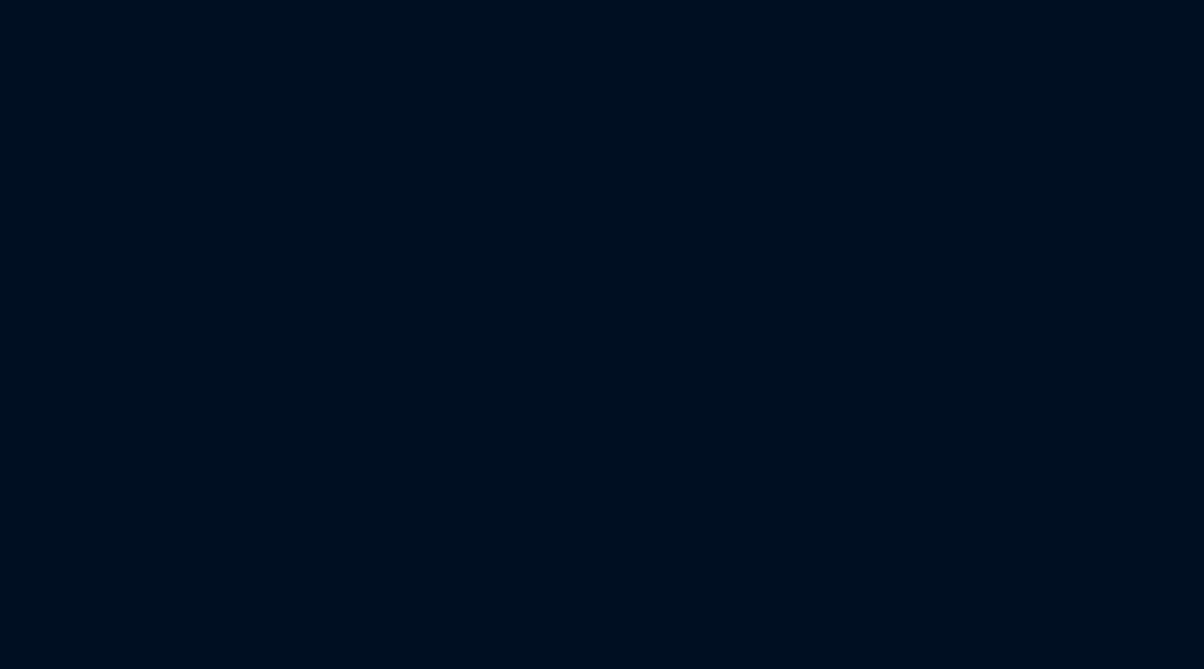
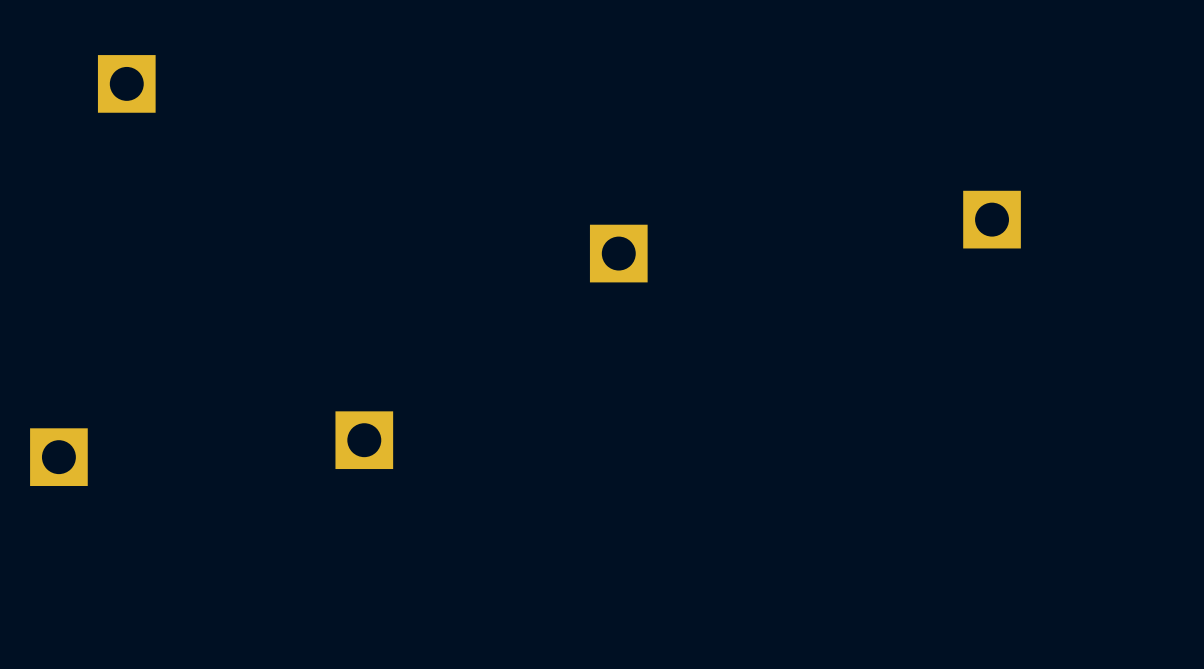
part: none -> (126, 83)
part: none -> (992, 219)
part: none -> (618, 253)
part: none -> (364, 440)
part: none -> (58, 457)

